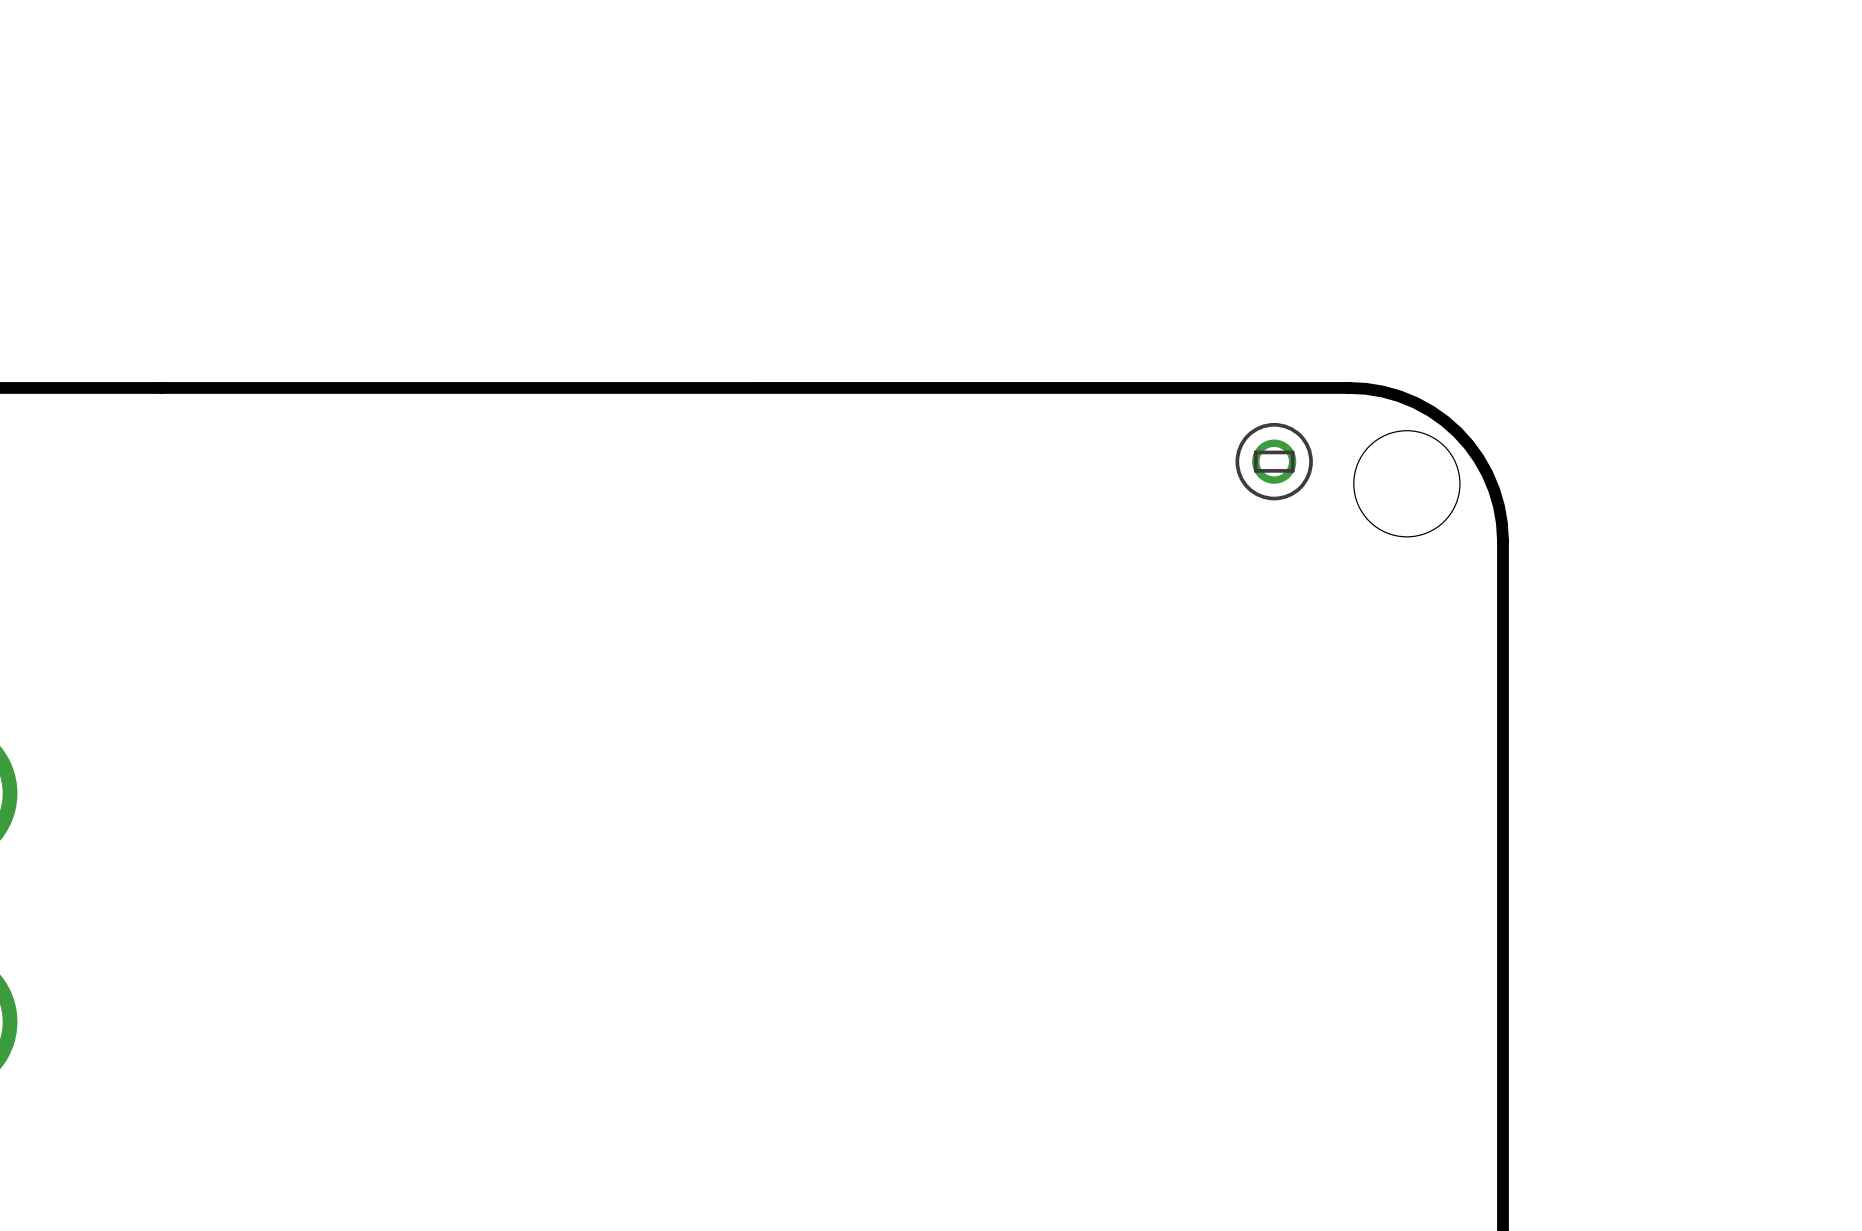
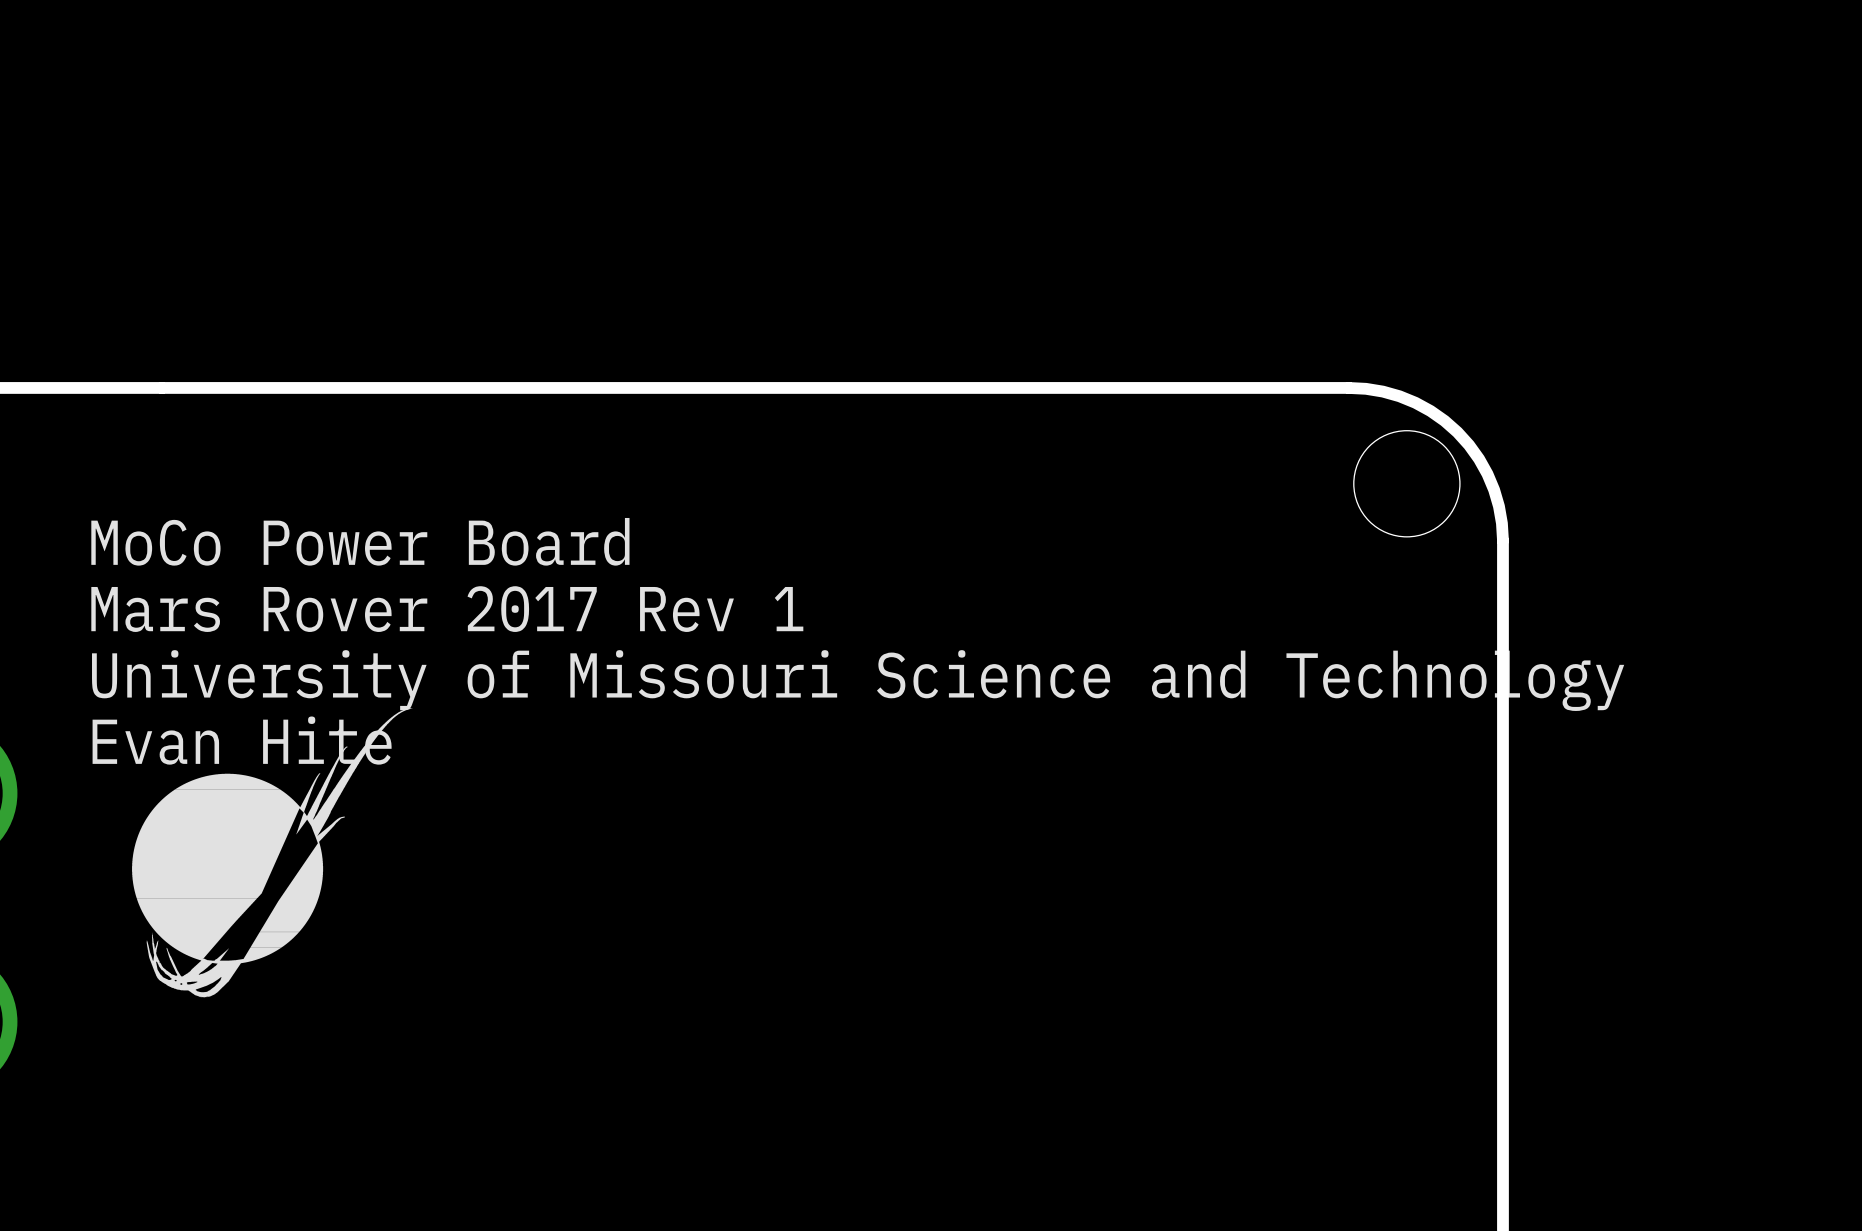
part: (1274, 461) -> none
text: none -> MoCo Power Board (360, 541)
text: none -> Mars Rover 2017 Rev 1 (447, 609)
text: none -> University of Missouri Science and Technology (858, 680)
drawing: none -> [132, 708, 413, 998]
text: none -> Evan Hite (242, 740)

